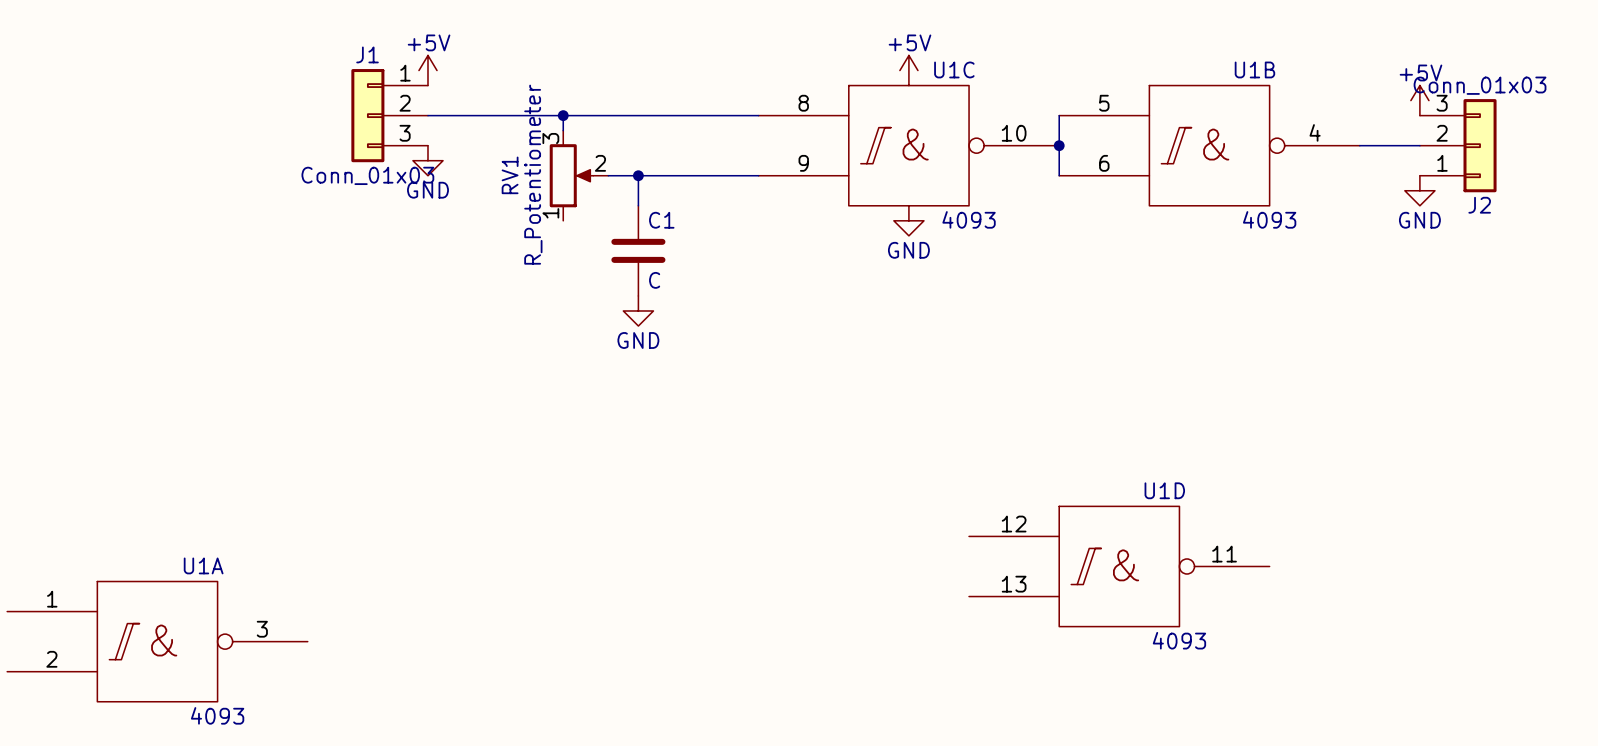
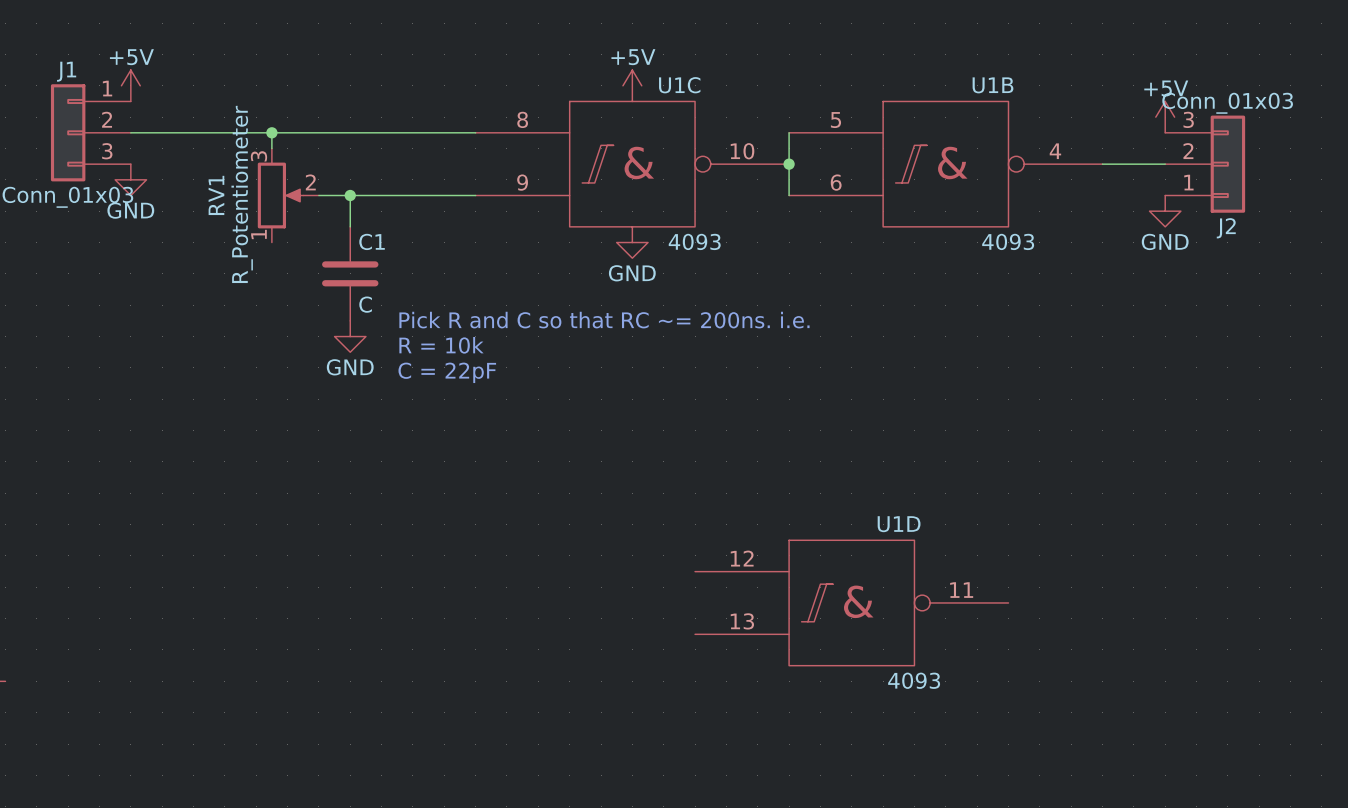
text: none -> Pick R and C so that RC ~= 200ns. i.e. (604, 320)
text: none -> R = 10k (441, 345)
text: none -> C = 22pF (447, 372)

